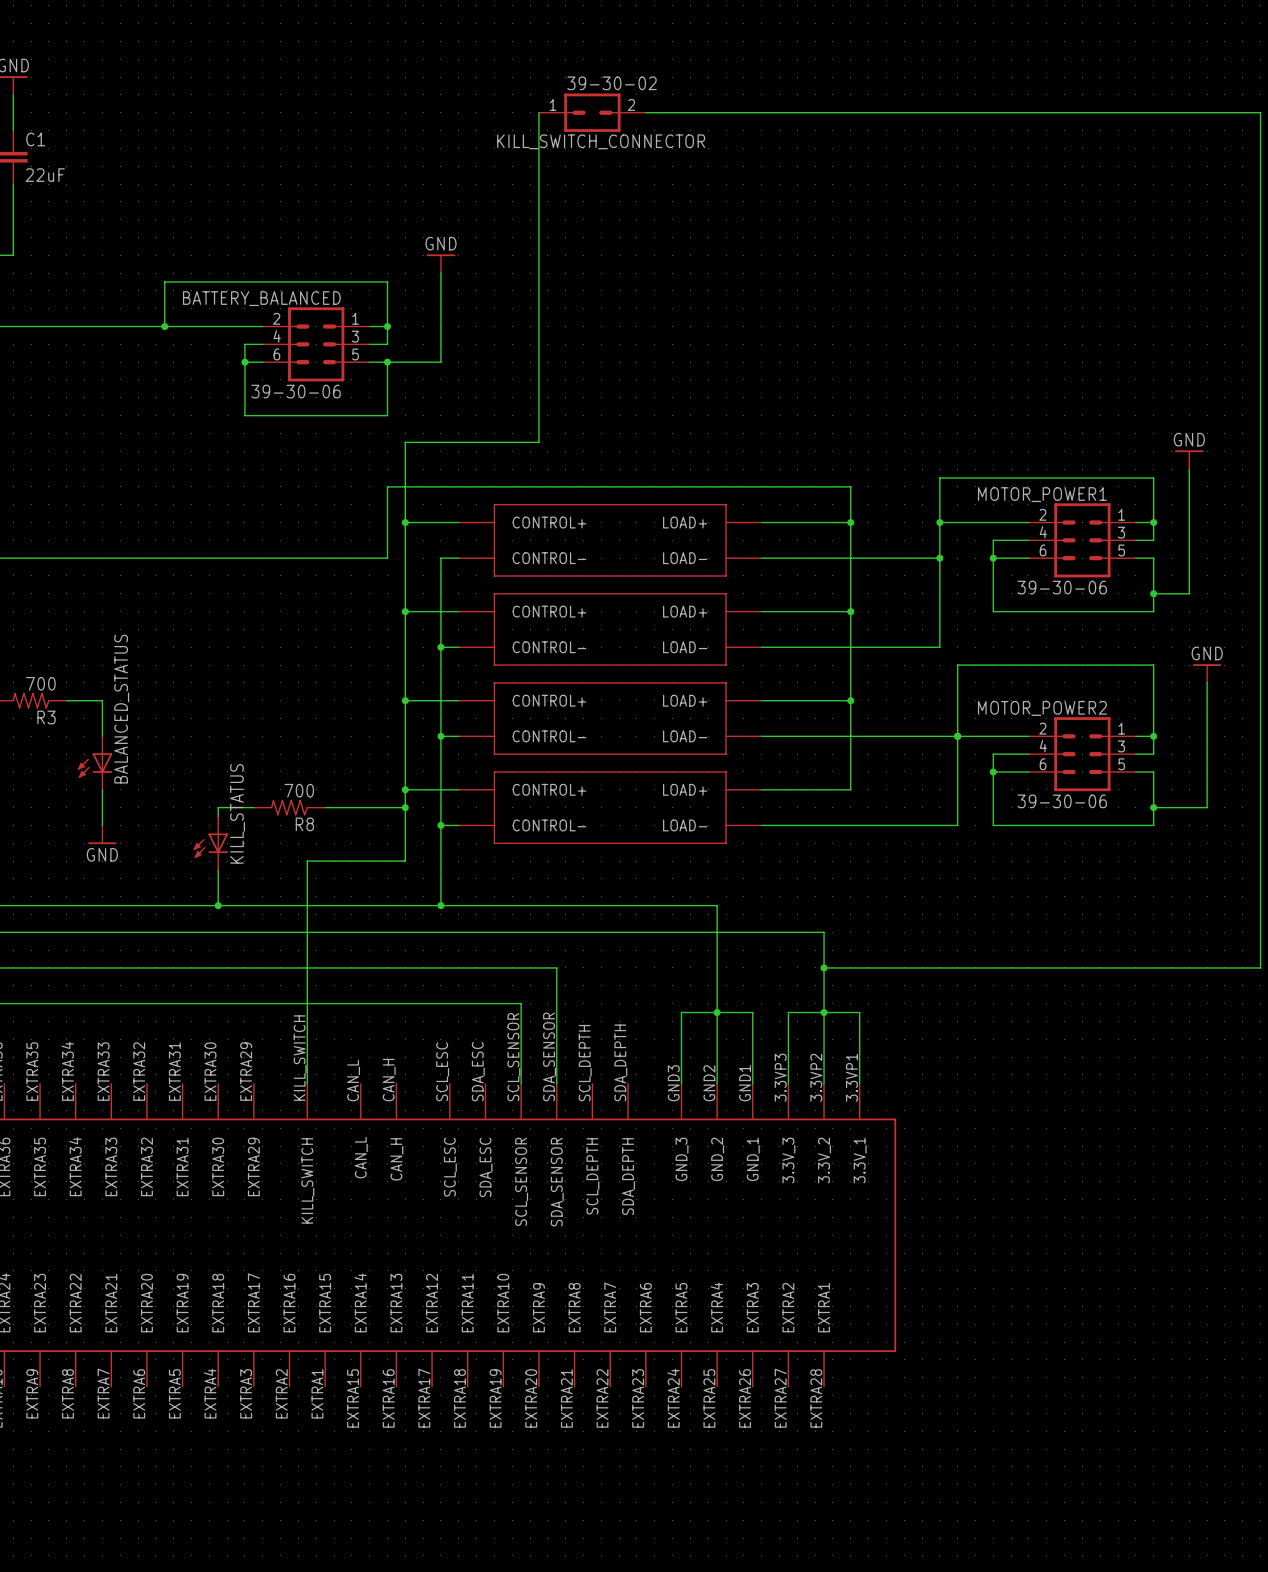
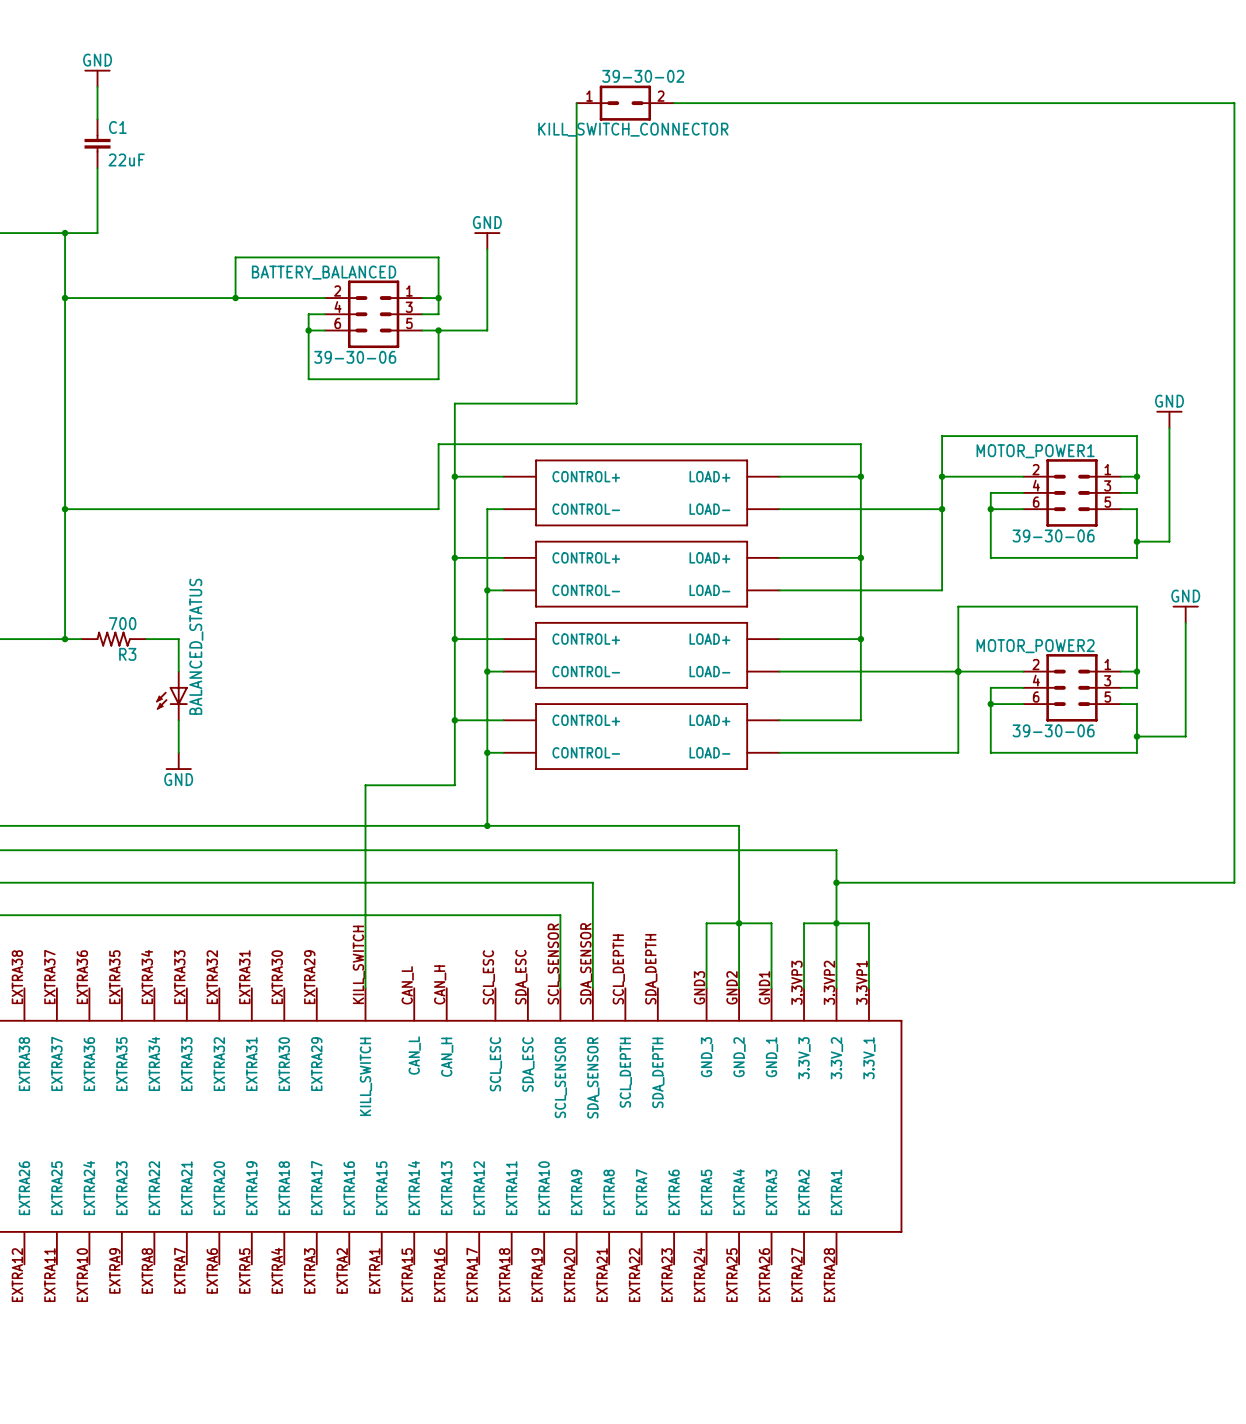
wire: (253, 807) (218, 807) (218, 816) -> none
R8: 700 (289, 807) -> none
wire: (325, 807) (405, 807) -> none
junction: (405, 807) -> none
KILL_STATUS: (210, 843) -> none
wire: (218, 869) (218, 905) -> none
junction: (218, 905) -> none

